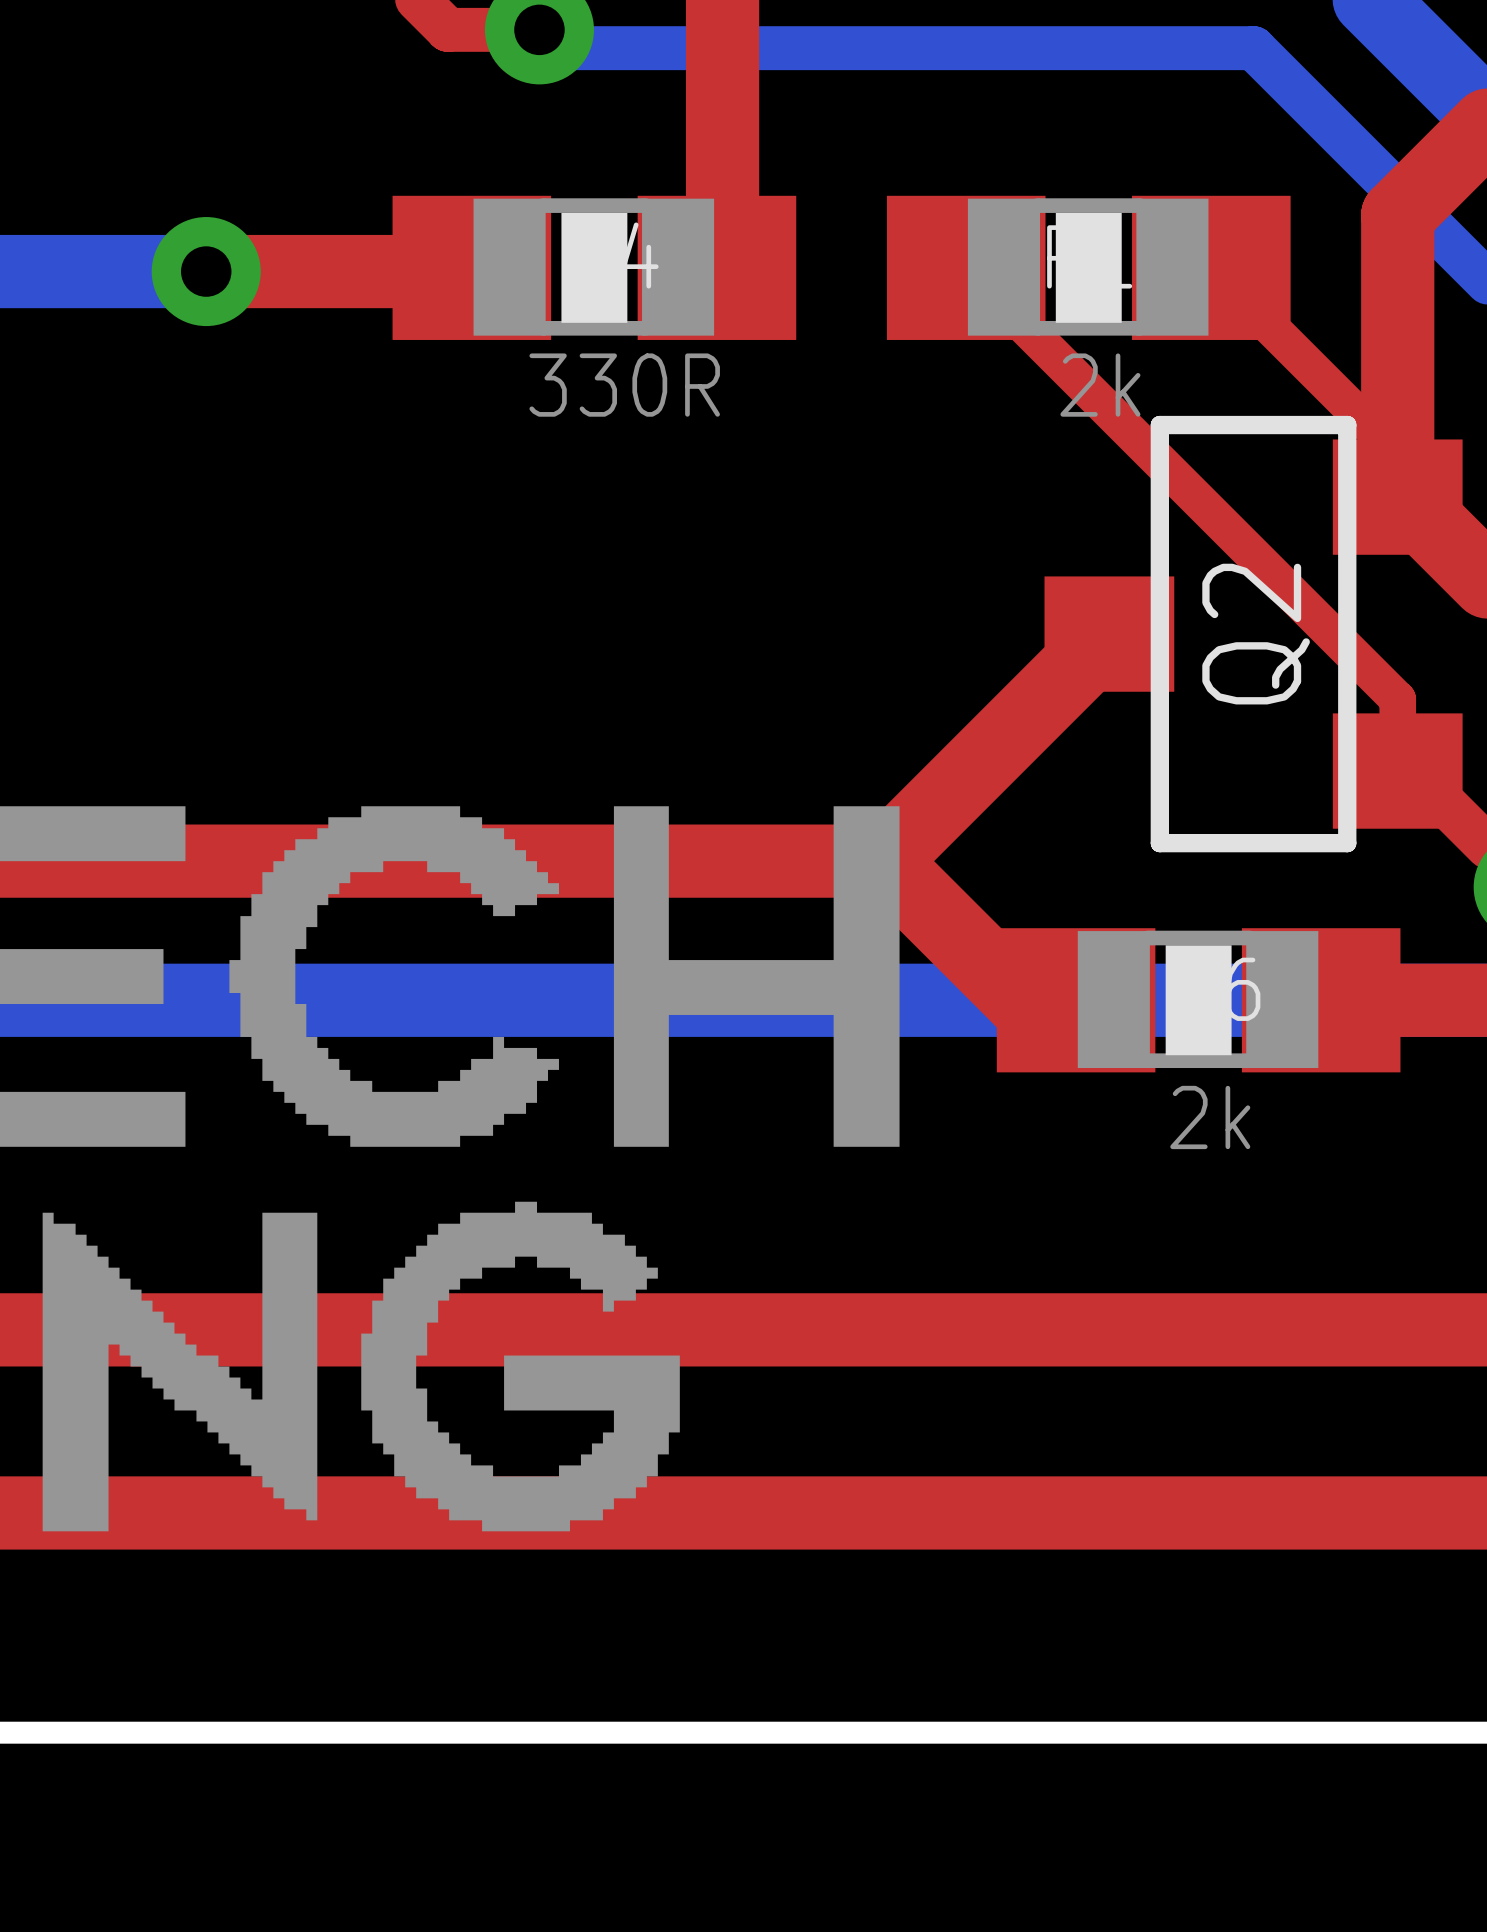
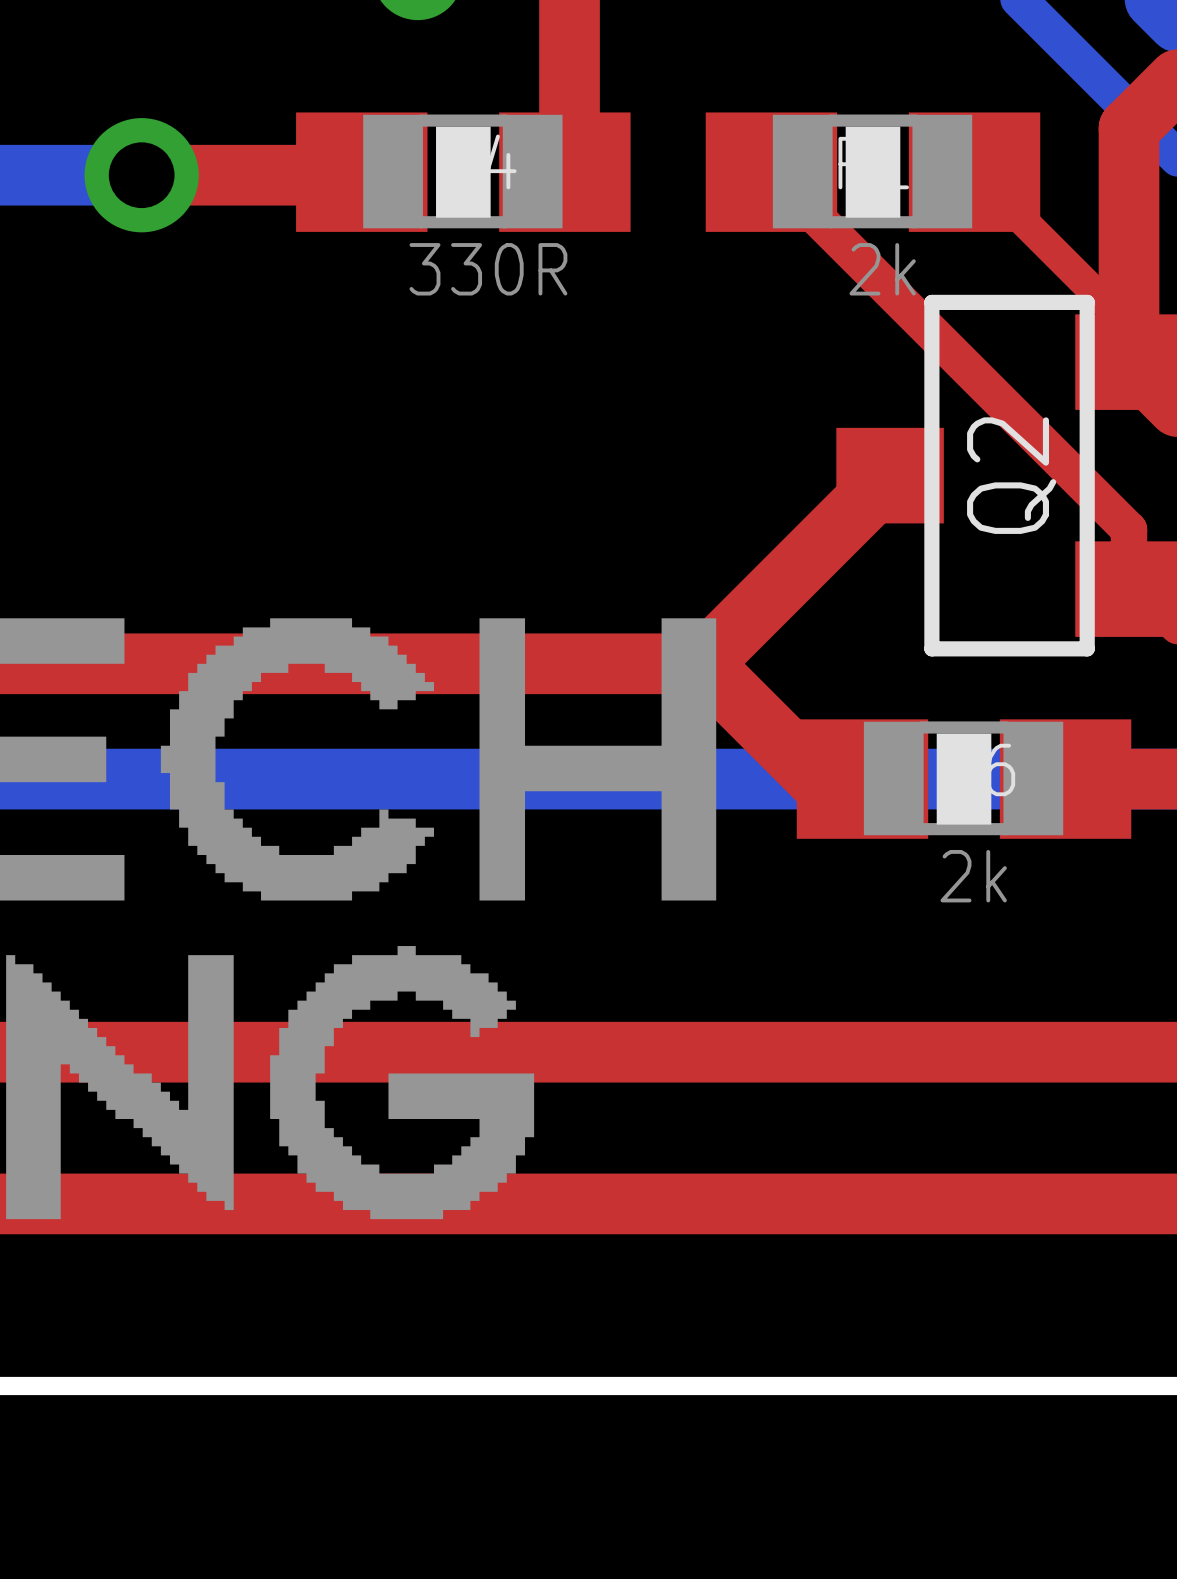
via size: [151, 217, 261, 327] -> [84, 118, 199, 233]
top track width: thin (966, 267) (1397, 699) (1397, 771) -> thick (771, 172) (1129, 529) (1129, 589)

